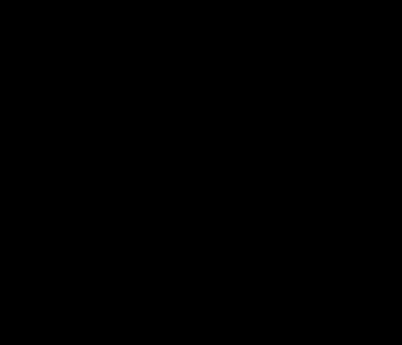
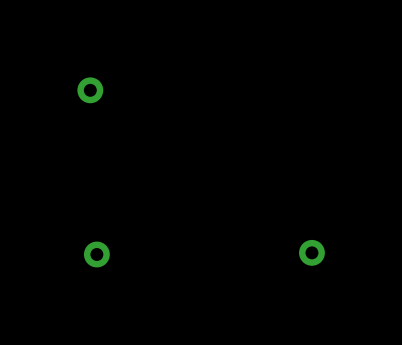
via: none -> (90, 90)
via: none -> (311, 252)
via: none -> (96, 254)

